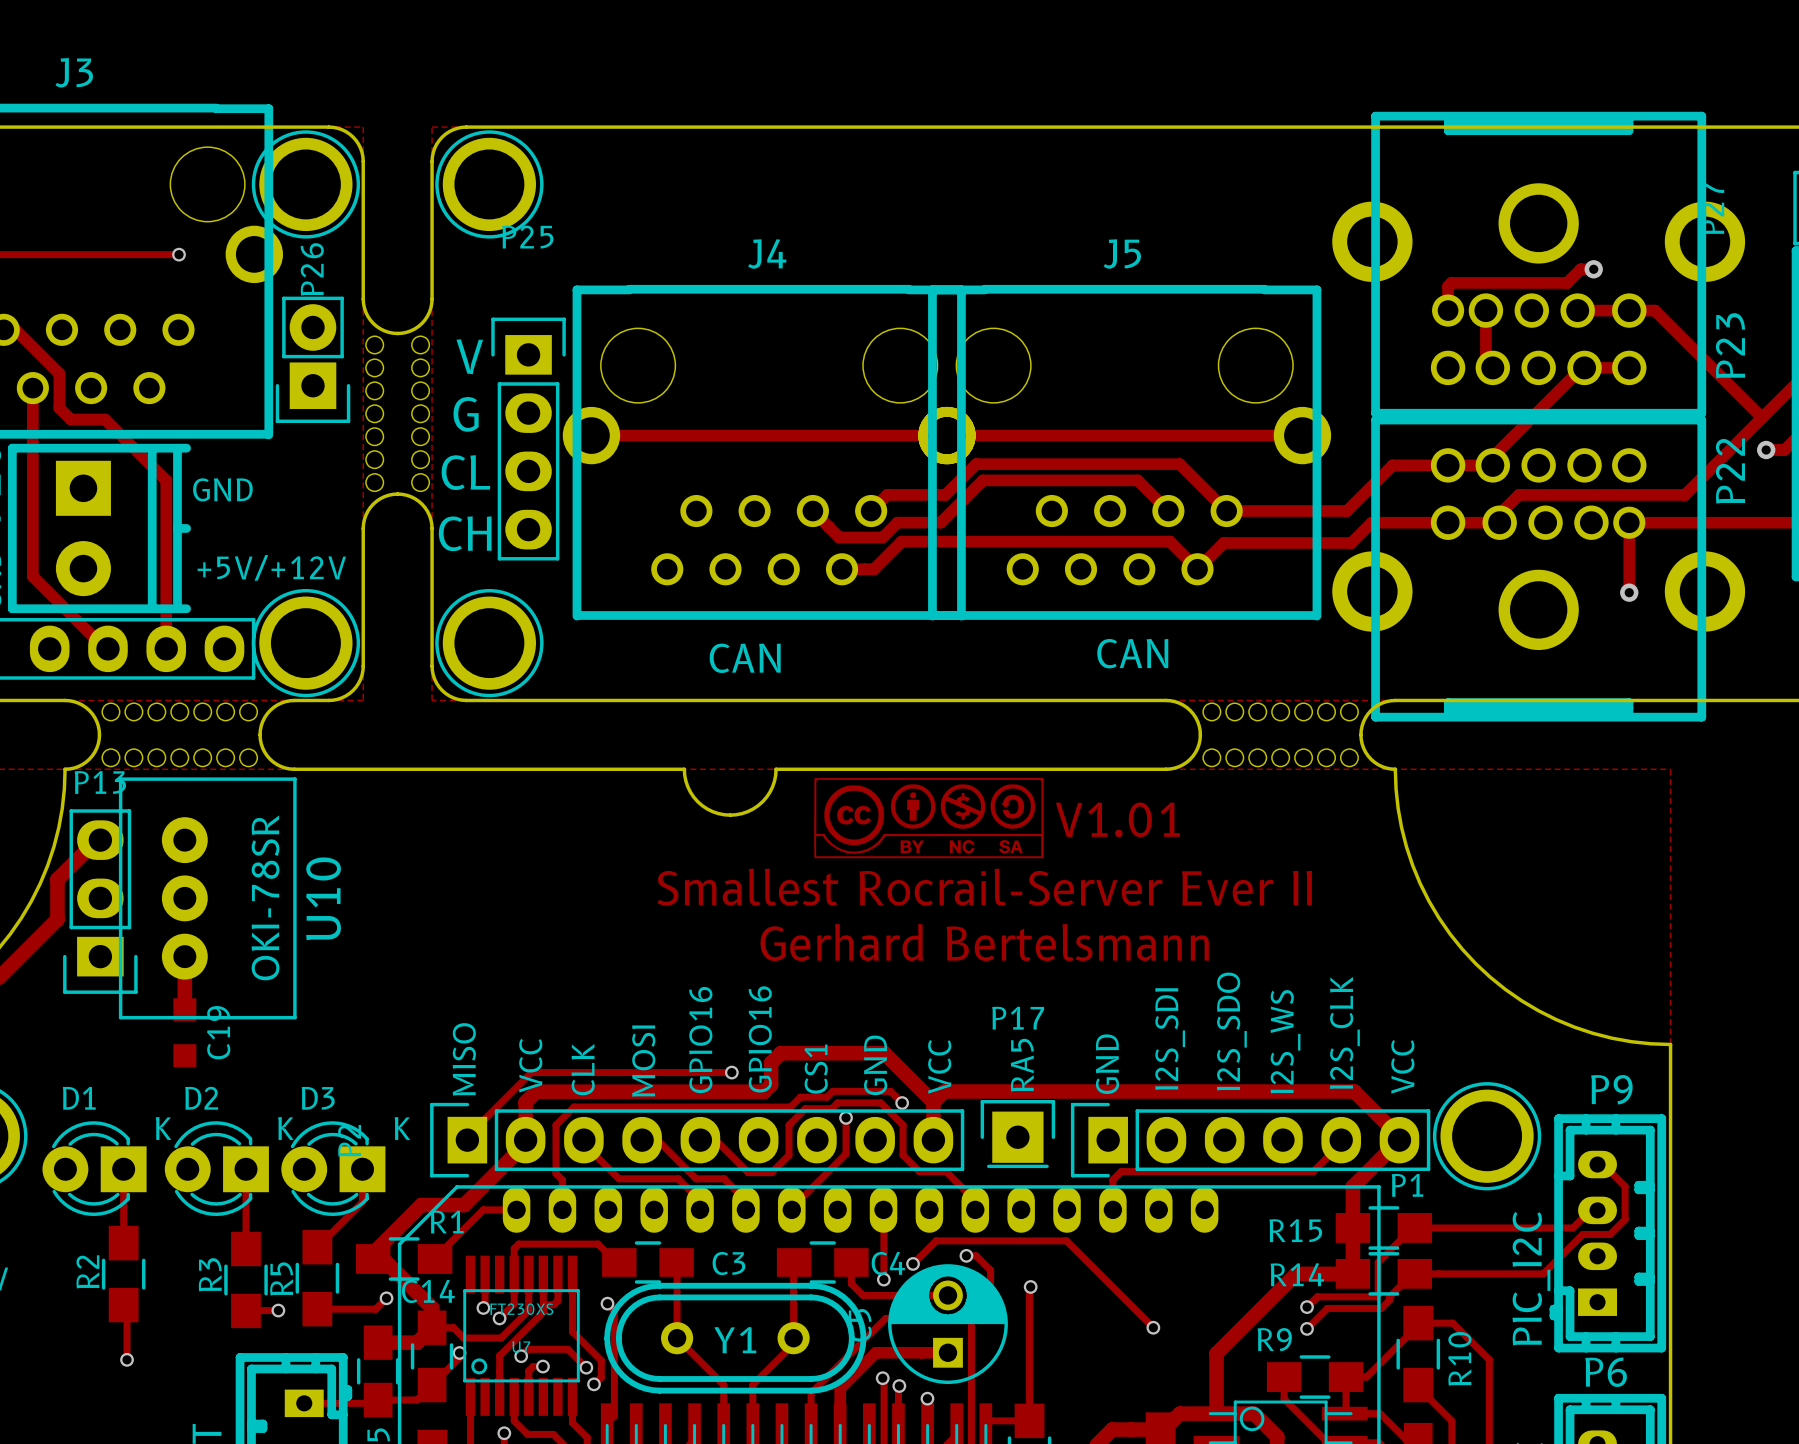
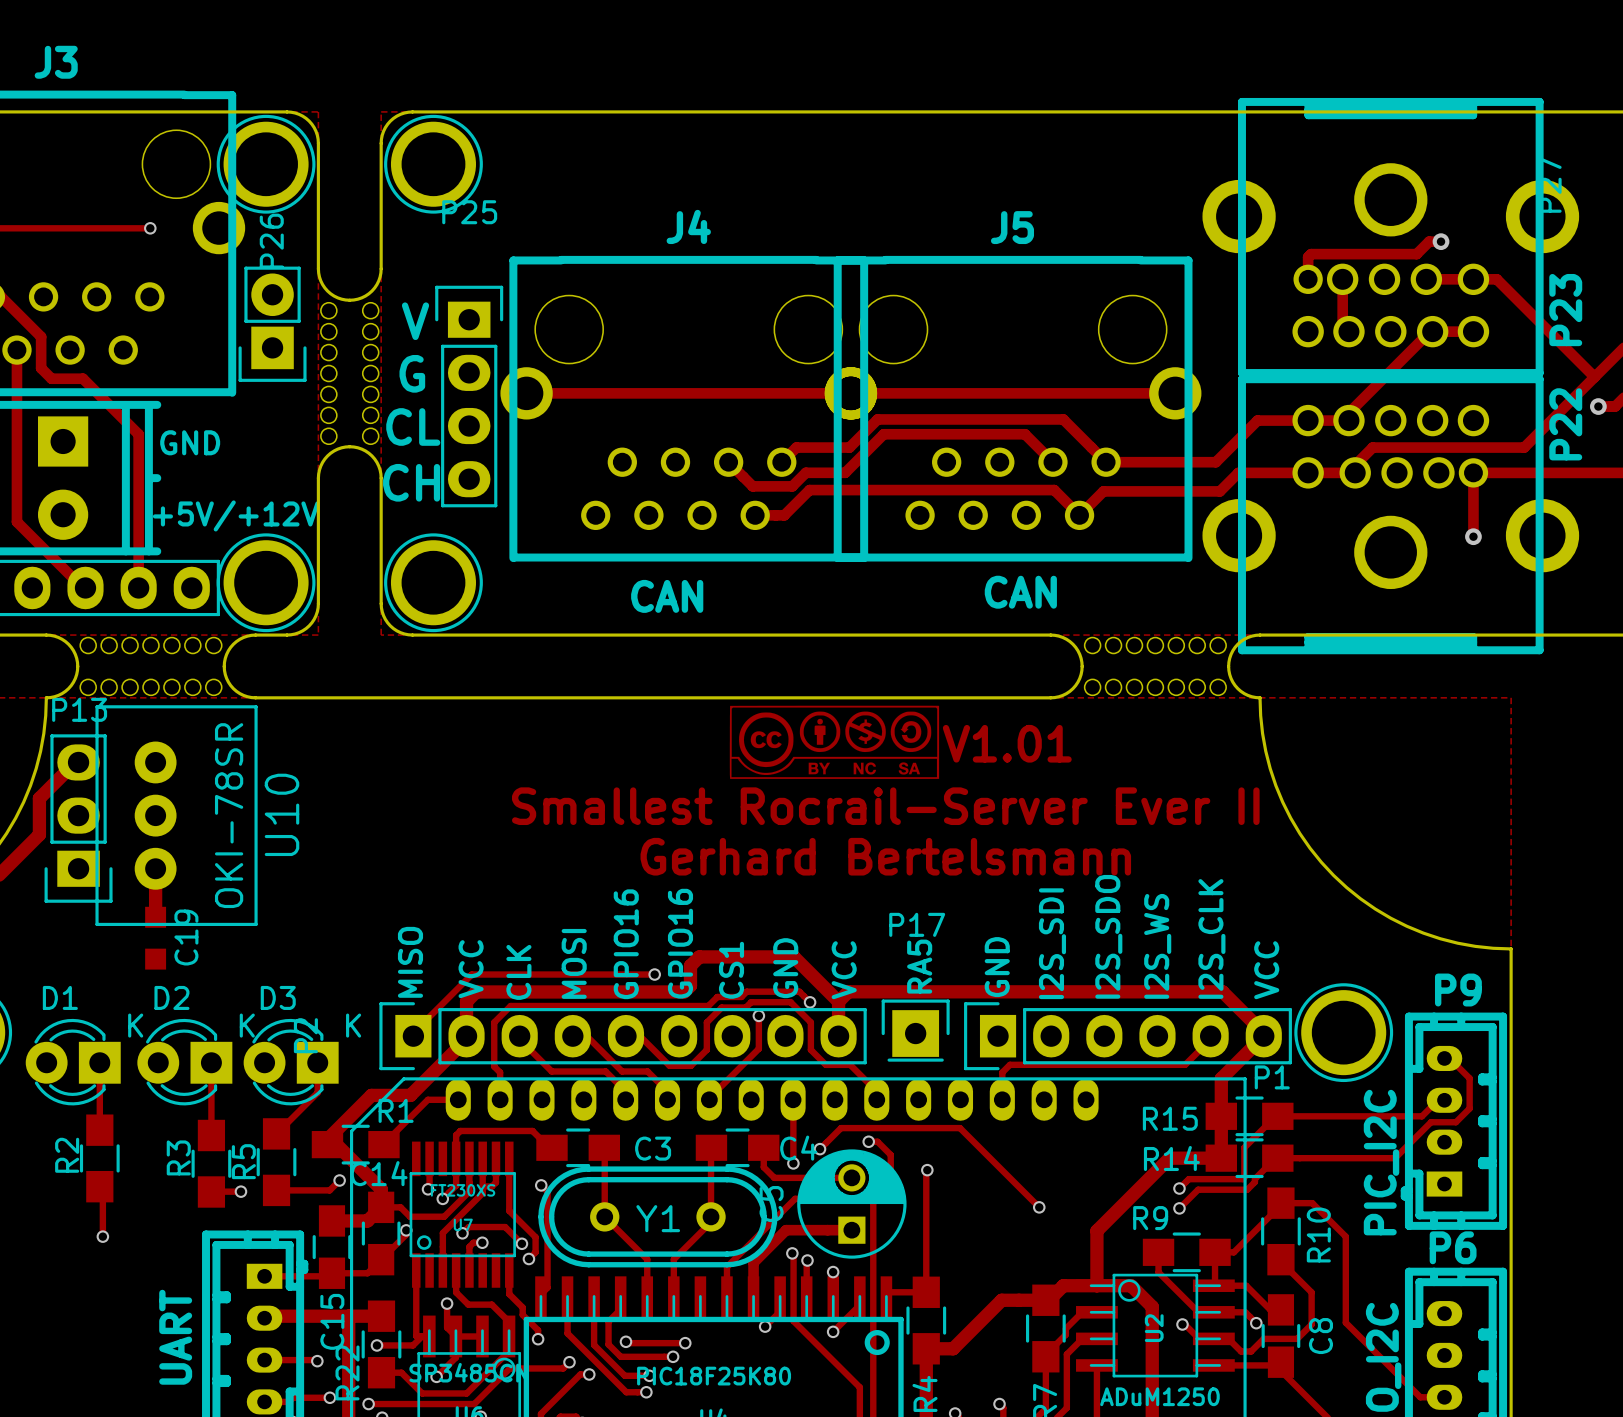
board edge: (684, 769) (687, 786) (697, 801) (712, 811) (730, 815) (747, 811) (762, 801) (772, 786) (776, 769) -> (611, 697) (695, 697)

